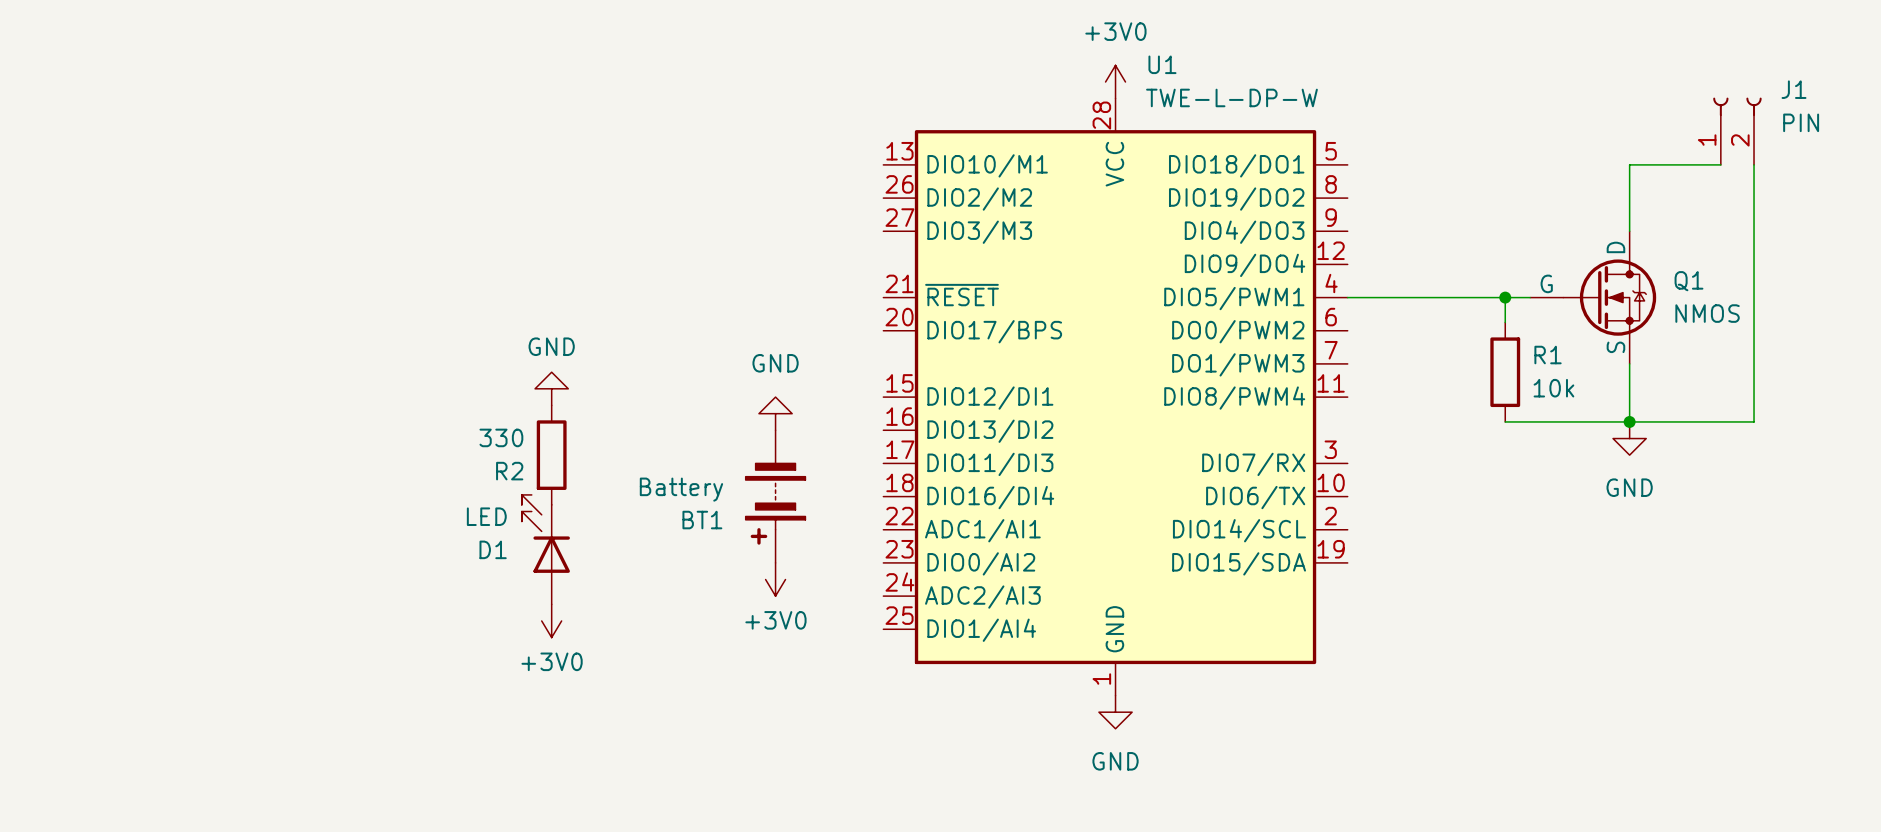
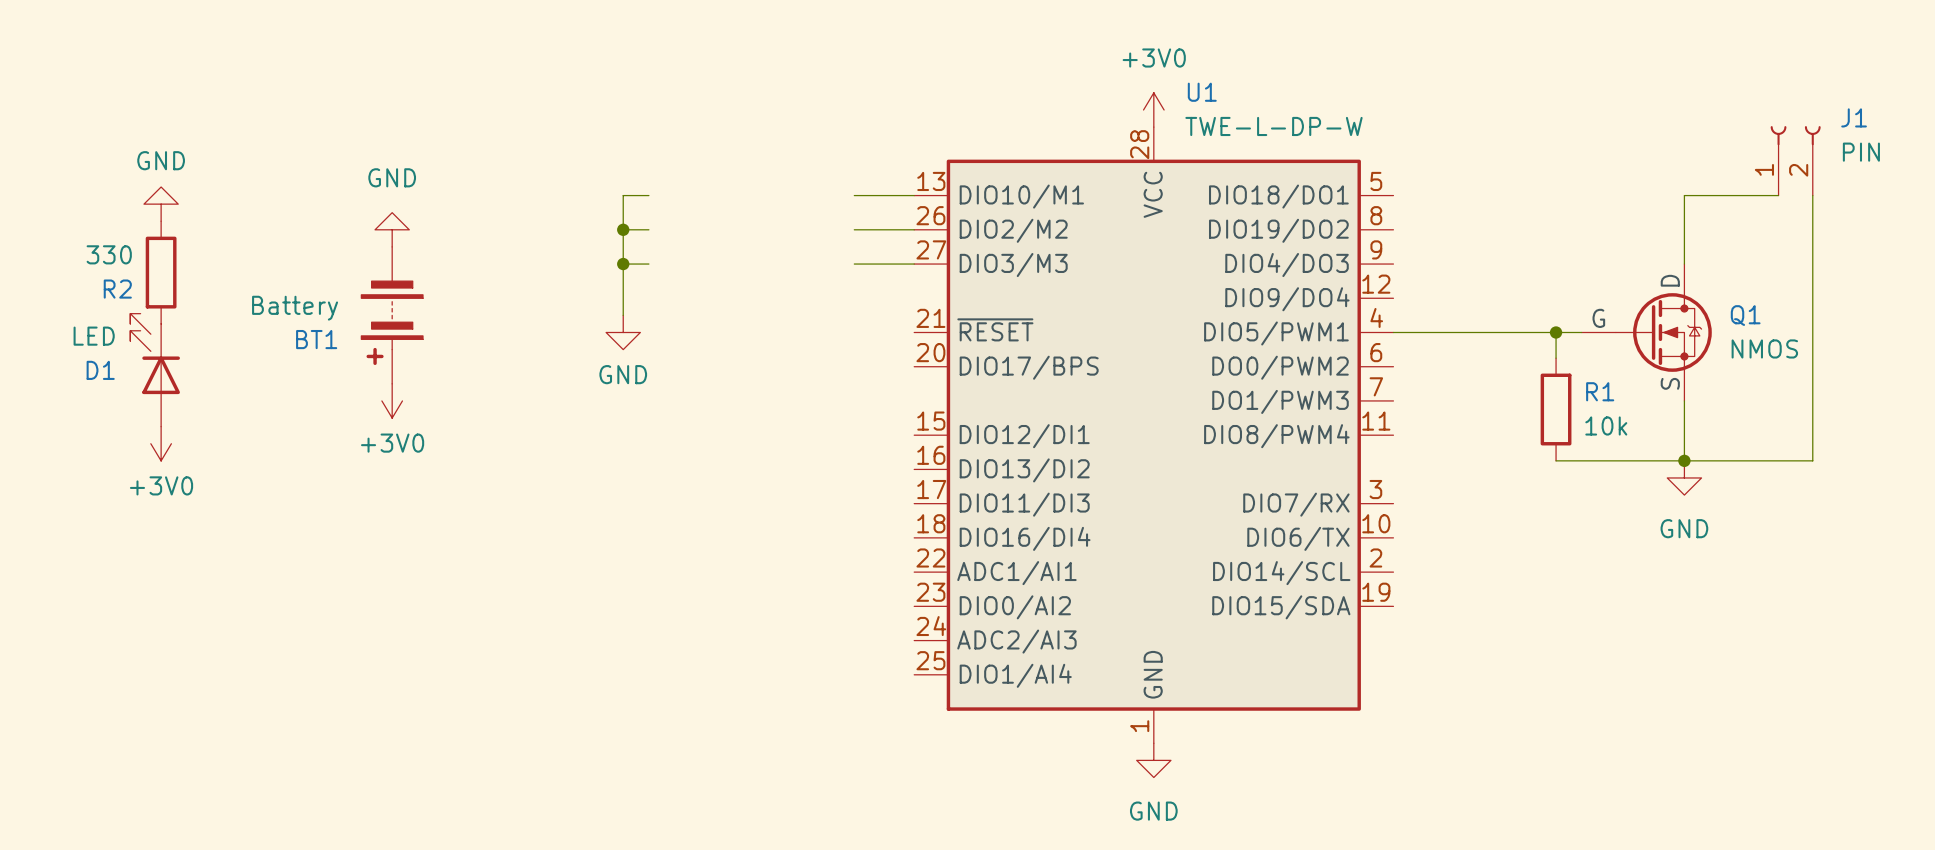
wire: none -> (648, 195) (623, 195) (623, 315)
wire: none -> (854, 195) (914, 195)
power symbol: none -> GND (161, 204)
power symbol: none -> GND (392, 229)
wire: none -> (623, 229) (648, 229)
junction: none -> (623, 229)
wire: none -> (854, 229) (914, 229)
wire: none -> (623, 264) (648, 264)
junction: none -> (623, 264)
wire: none -> (854, 264) (914, 264)
power symbol: none -> +3V0 (392, 400)
power symbol rotation: 0° (551, 388) -> 180° (623, 332)
power symbol position: GND (551, 388) -> GND (623, 332)
power symbol: none -> +3V0 (161, 443)
power symbol: GND (775, 413) -> none
R2 position: (551, 455) -> (161, 272)
BT1 position: (775, 496) -> (392, 315)
D1 position: (545, 549) -> (155, 370)
power symbol: +3V0 (775, 579) -> none
power symbol: +3V0 (551, 620) -> none

